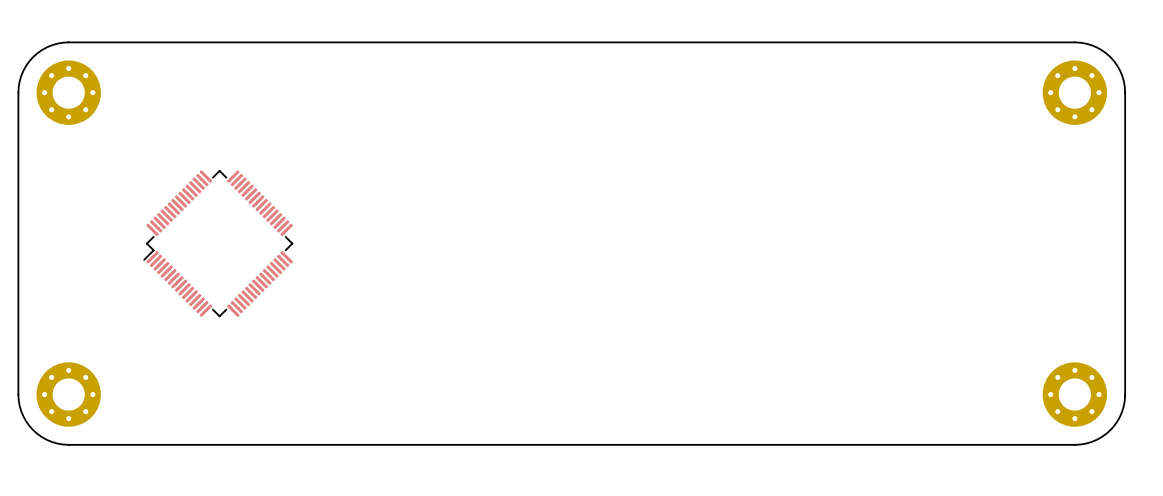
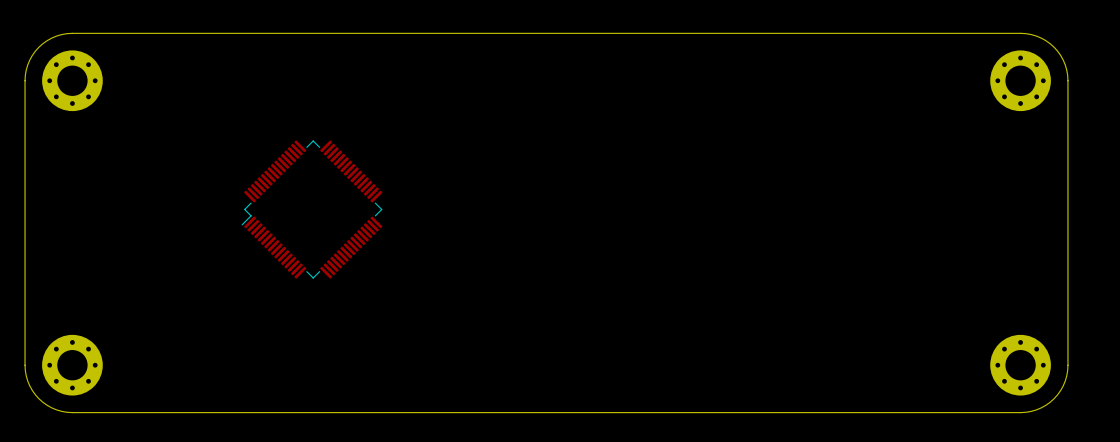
part position: (218, 243) -> (311, 209)

